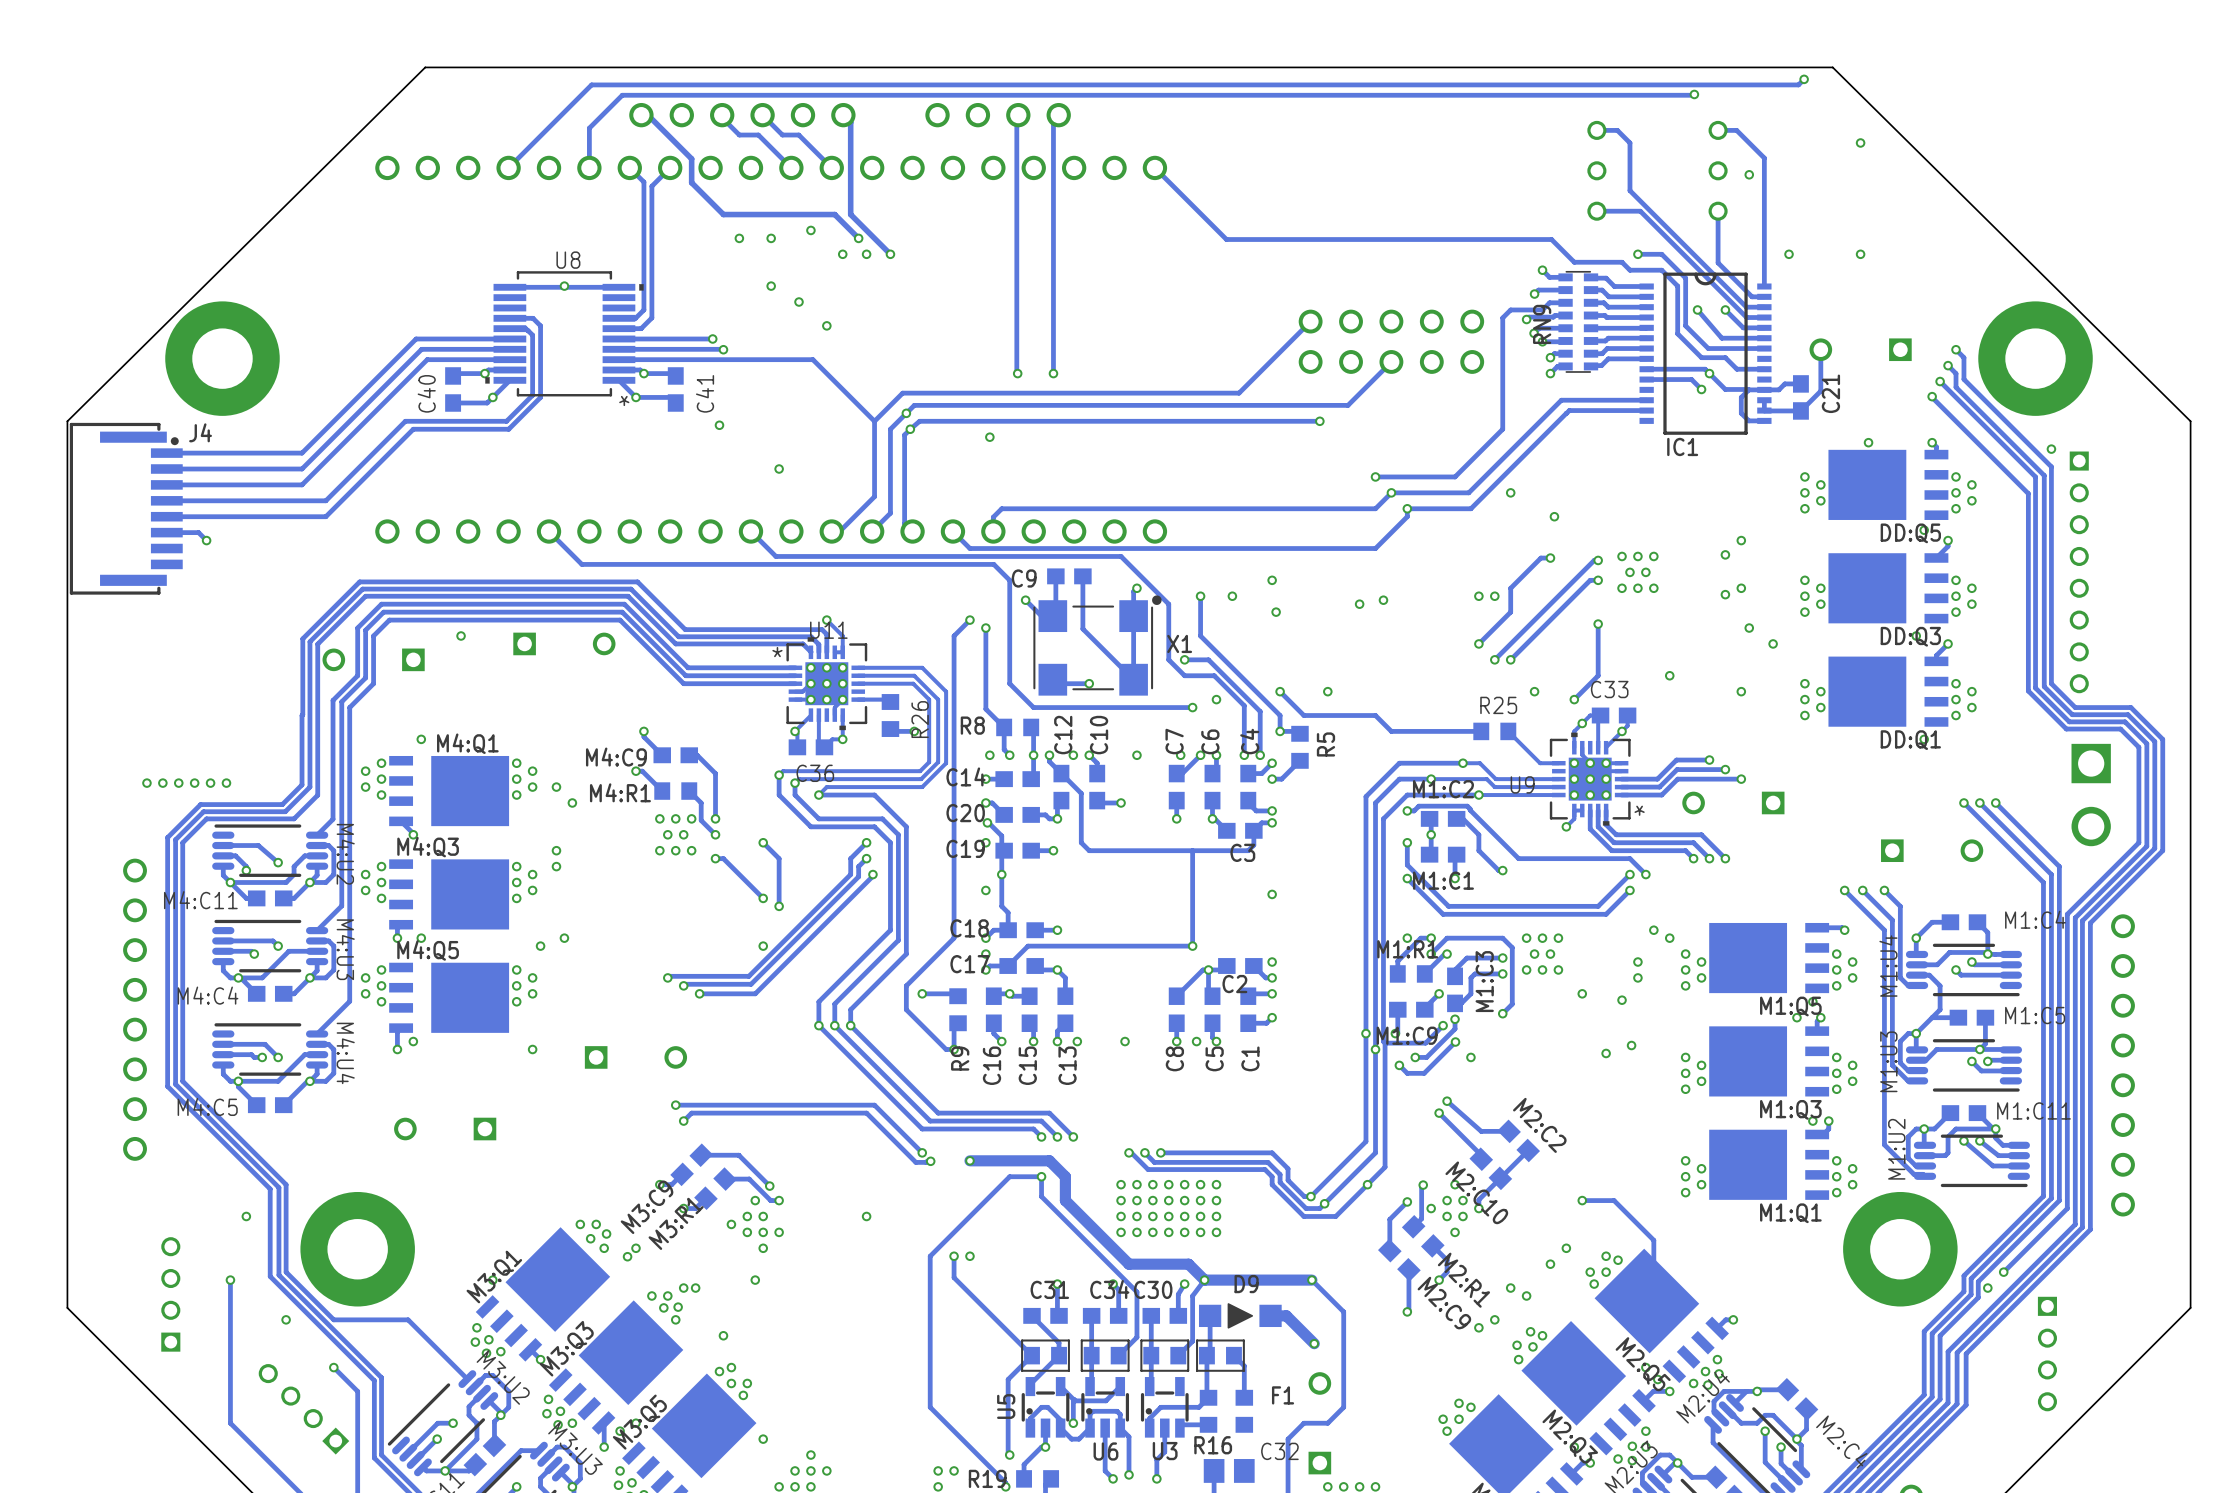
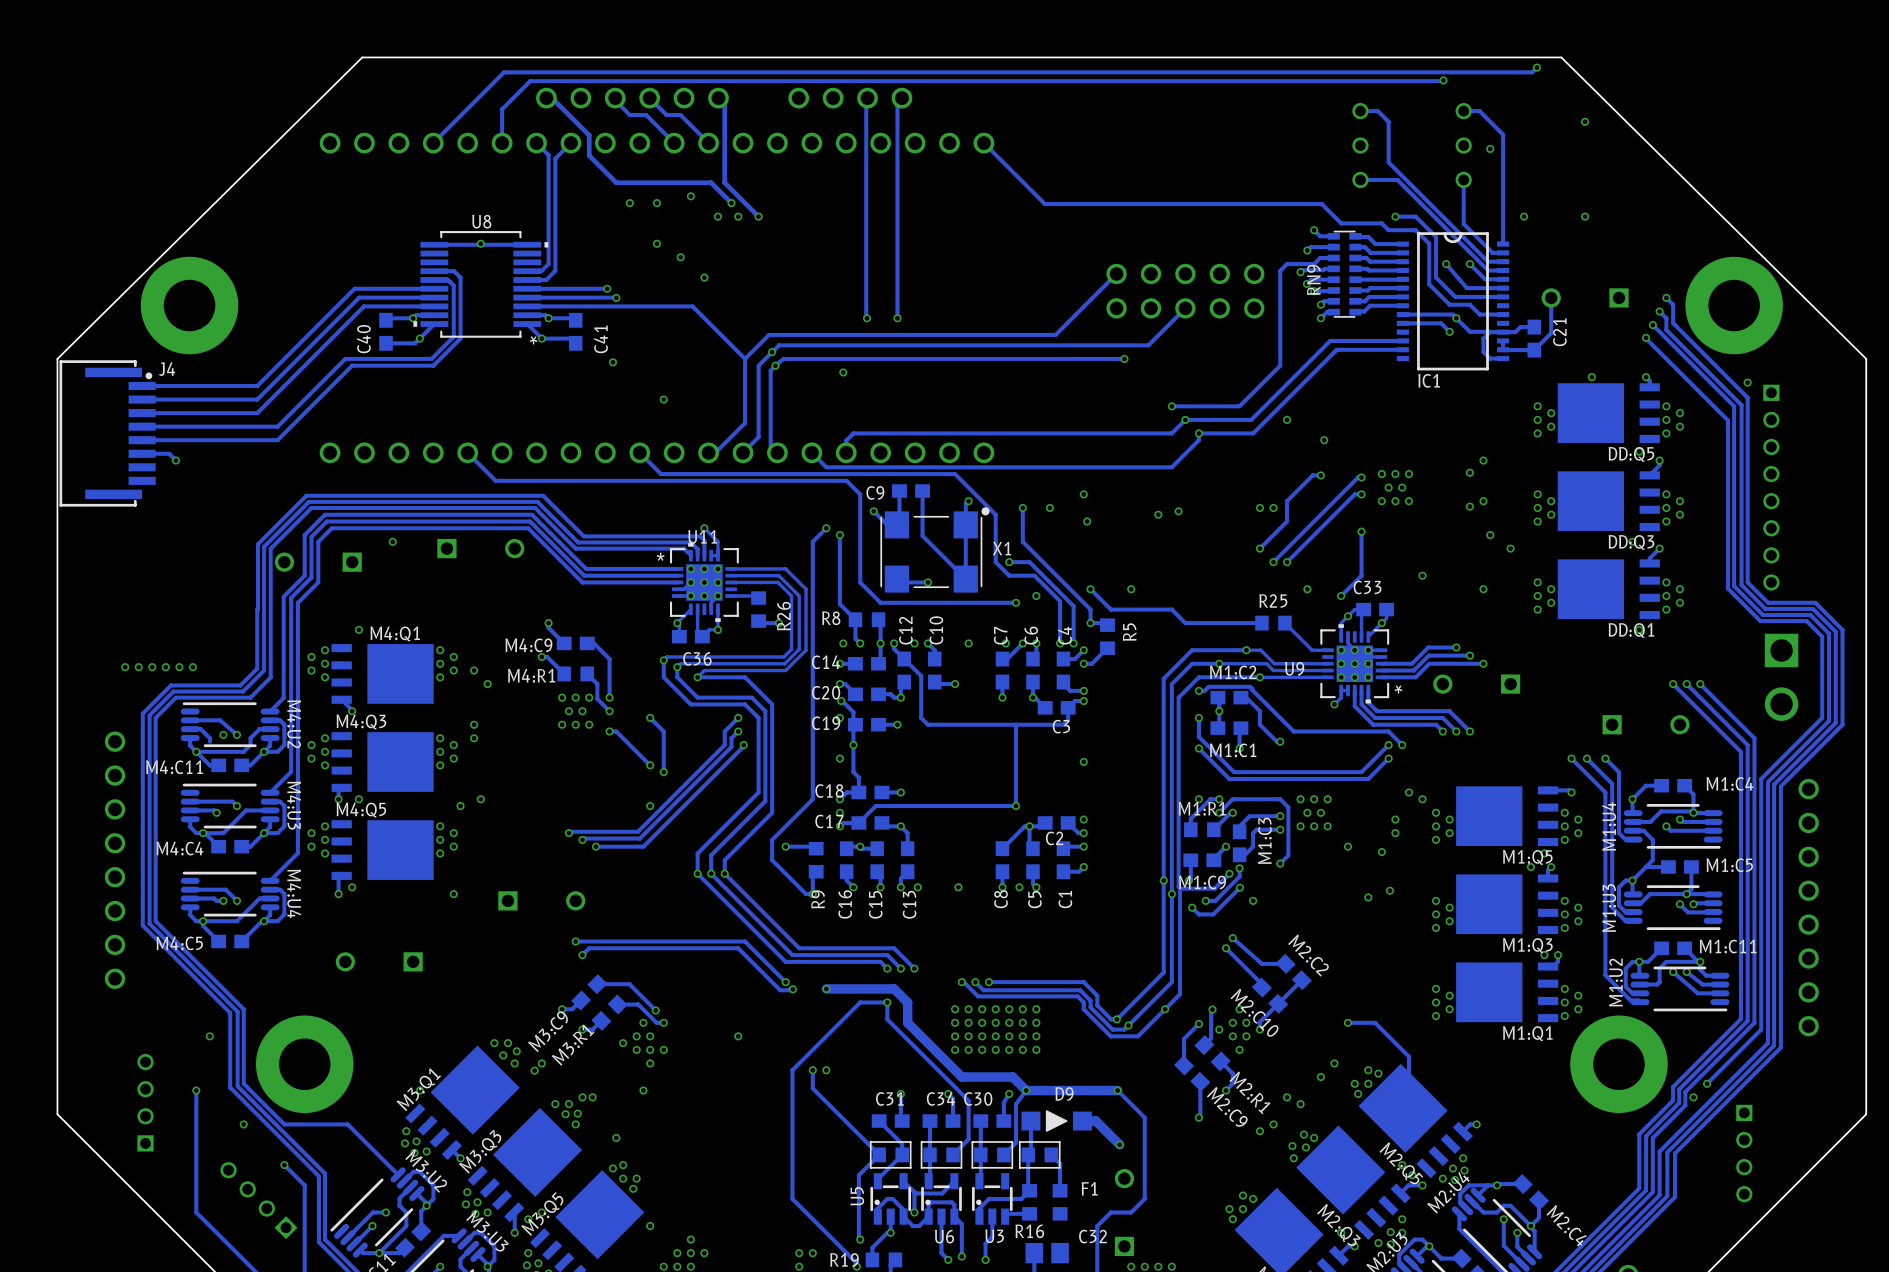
via position: (246, 870) -> (223, 734)

